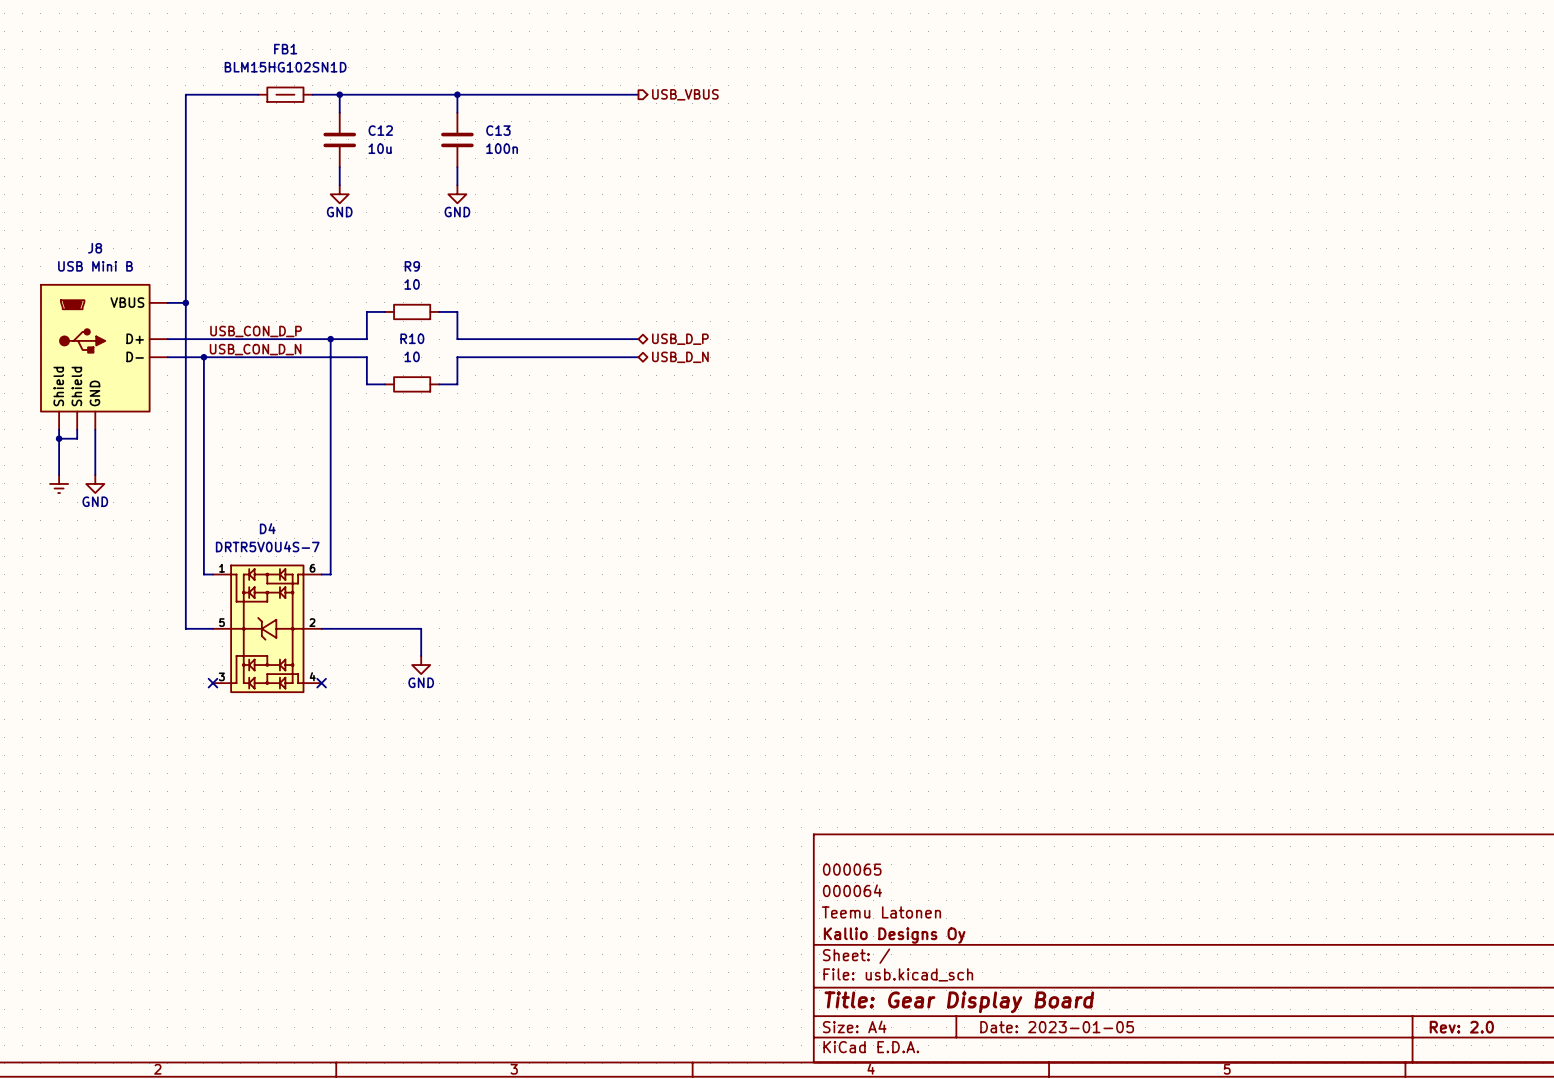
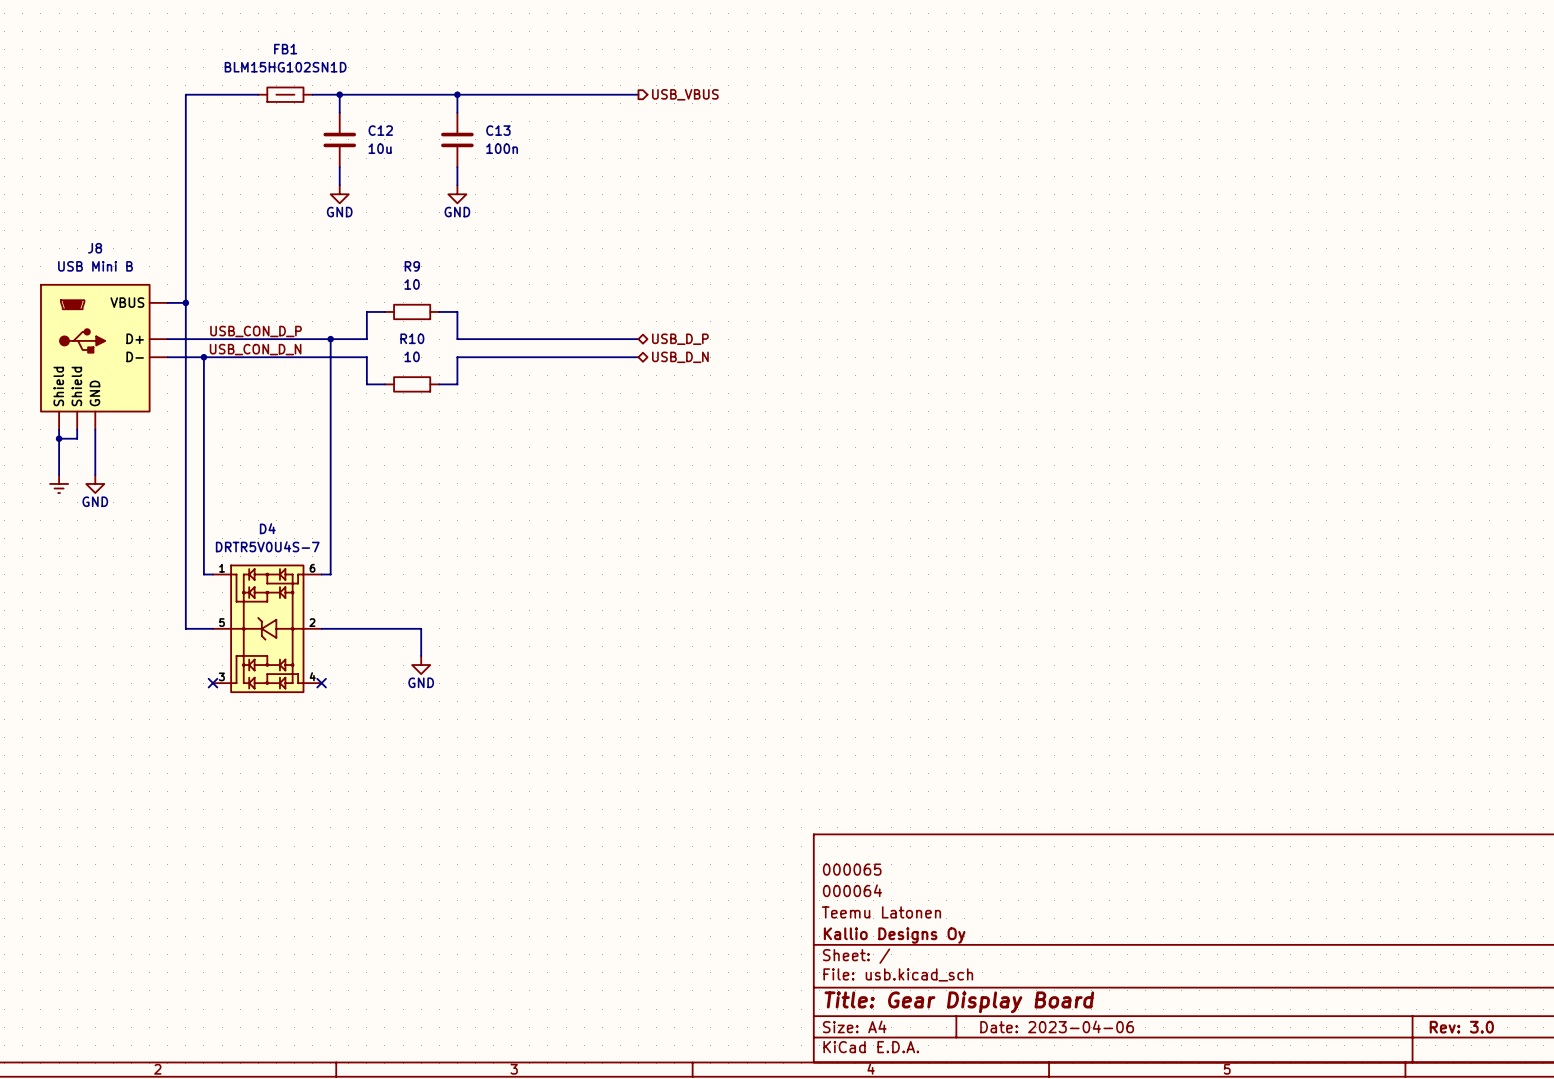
title block: Date: 2023-01-05 (1057, 1027) -> Date: 2023-04-06 (1057, 1026)
title block: Rev: 2.0 (1461, 1027) -> Rev: 3.0 (1461, 1027)

